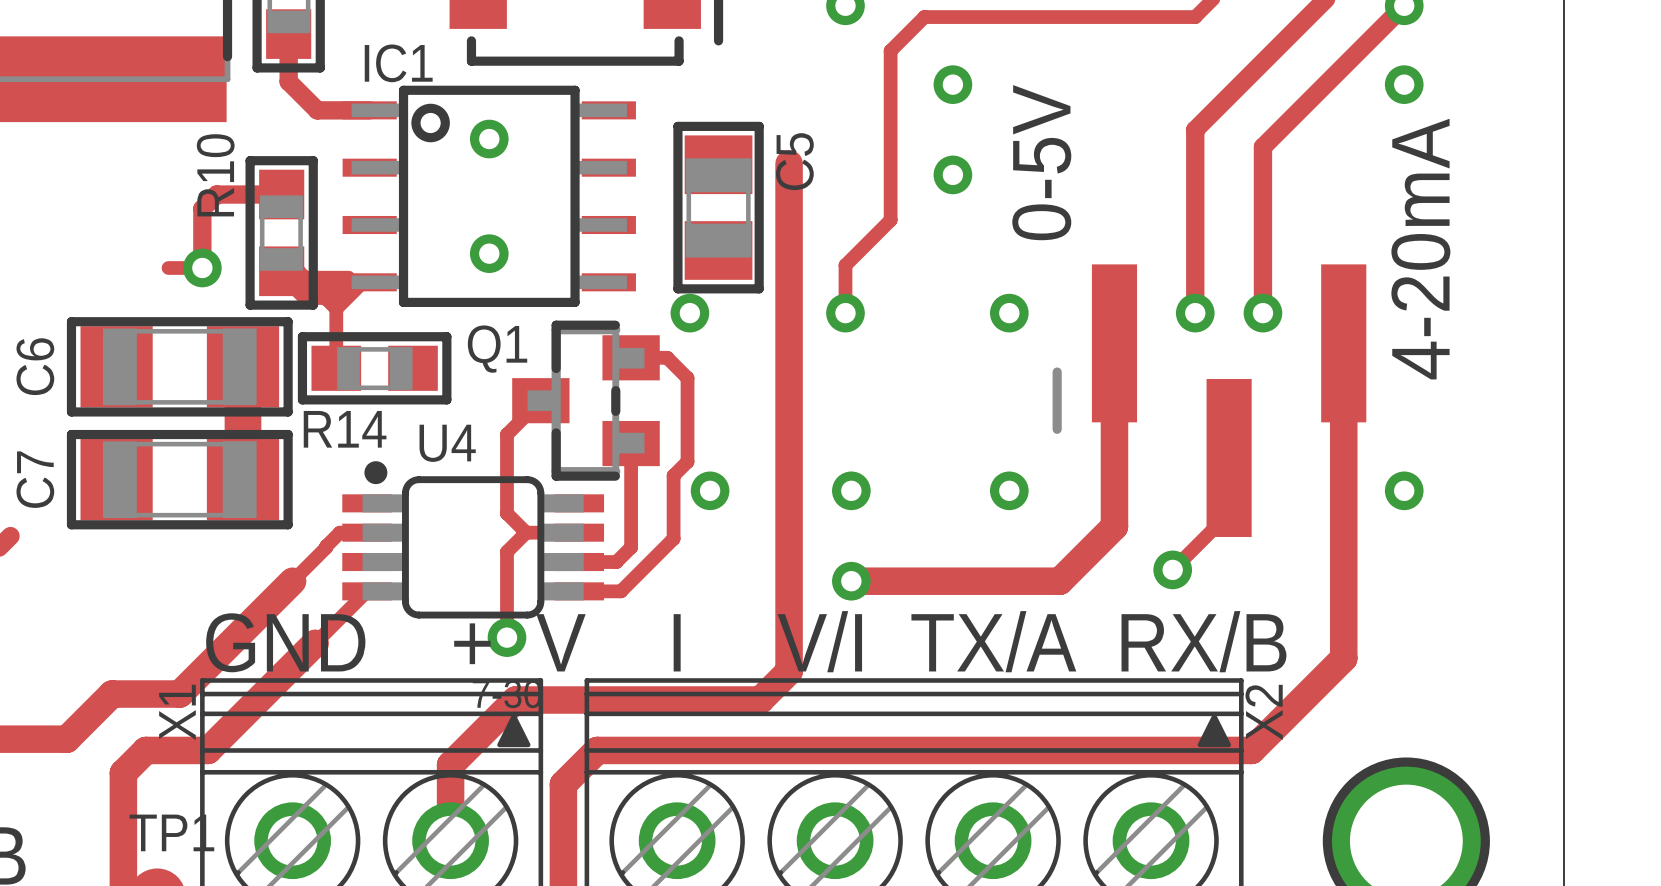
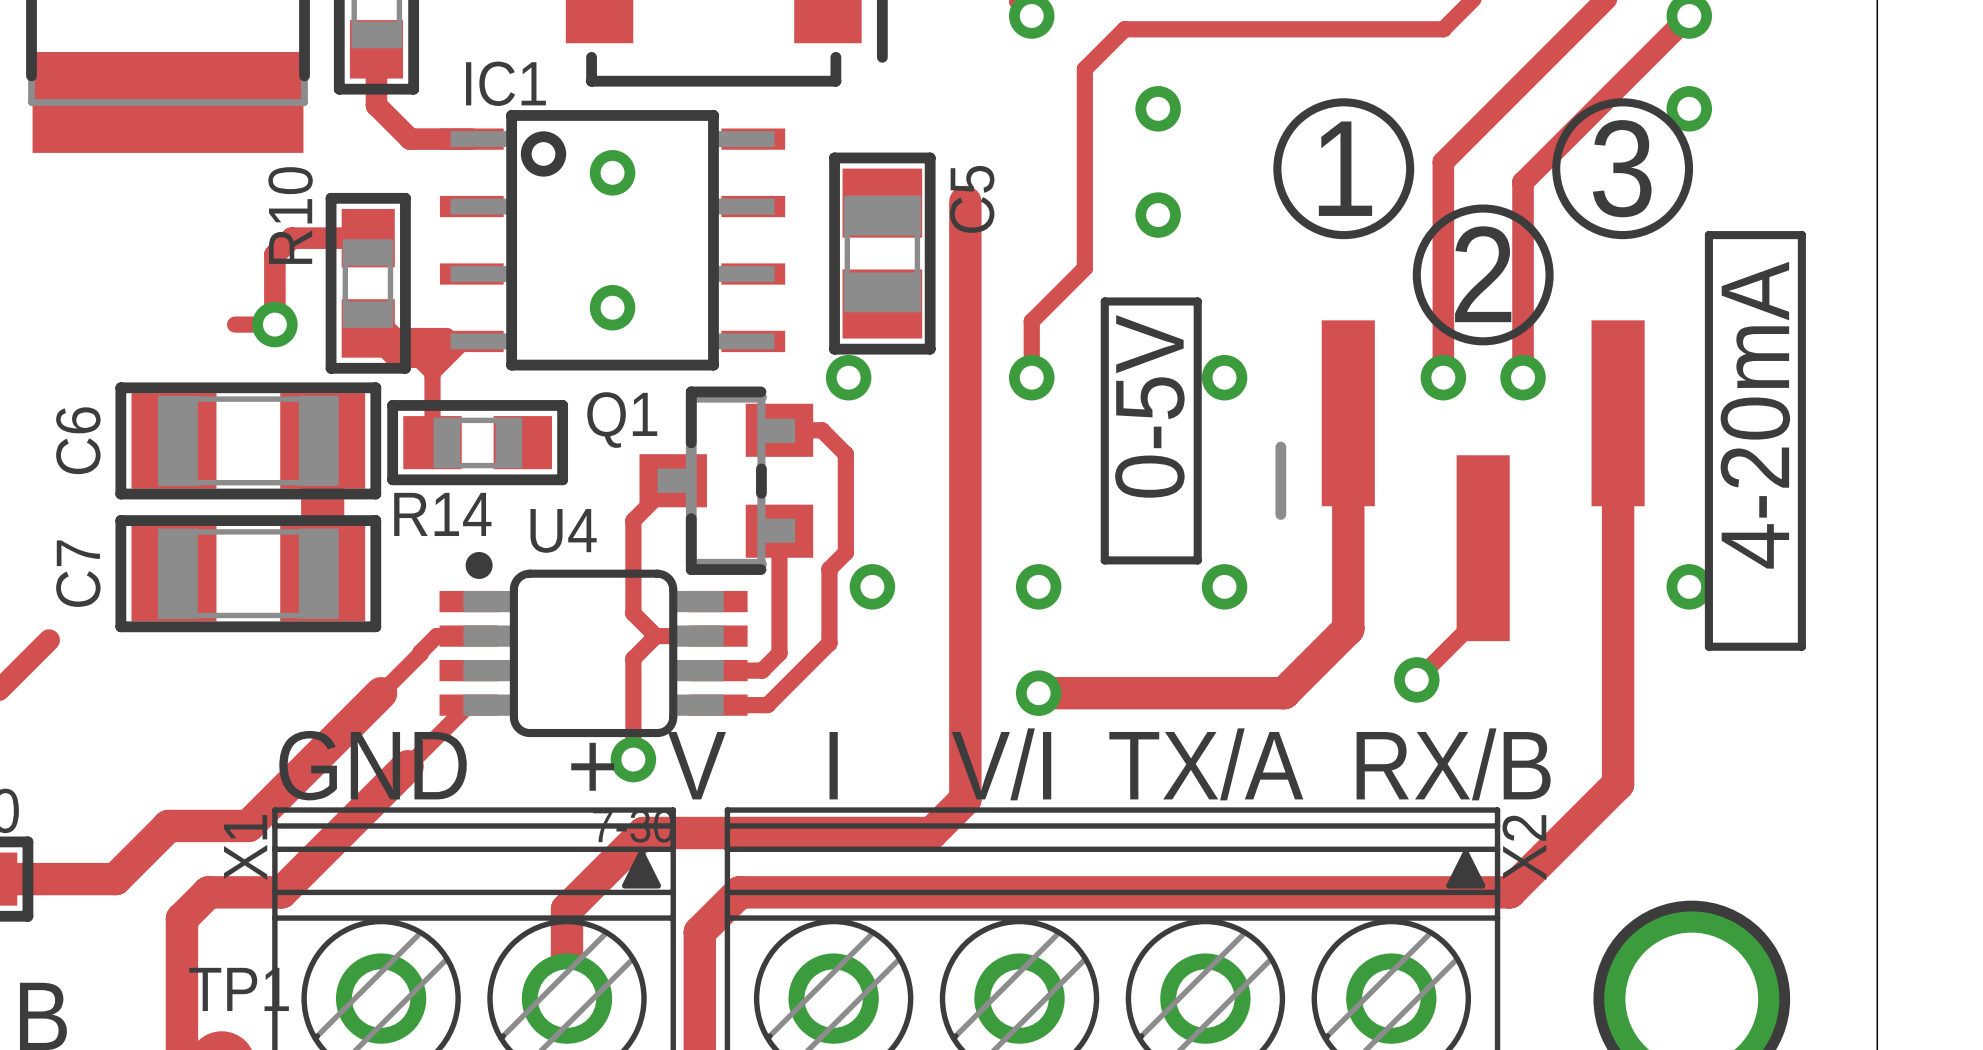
drawing: none -> [1273, 98, 1694, 346]
text: none -> 1 (1345, 168)
text: none -> 3 (1622, 168)
text position: 0-5V (1041, 162) -> 0-5V (1149, 406)
line: none -> (1708, 235) (1801, 235) (1801, 646) (1708, 646) (1708, 235)
text: none -> 2 (1483, 274)
line: none -> (1104, 301) (1104, 560) (1197, 560) (1197, 301) (1104, 301)
text position: 4-20mA (1420, 249) -> 4-20mA (1755, 415)

